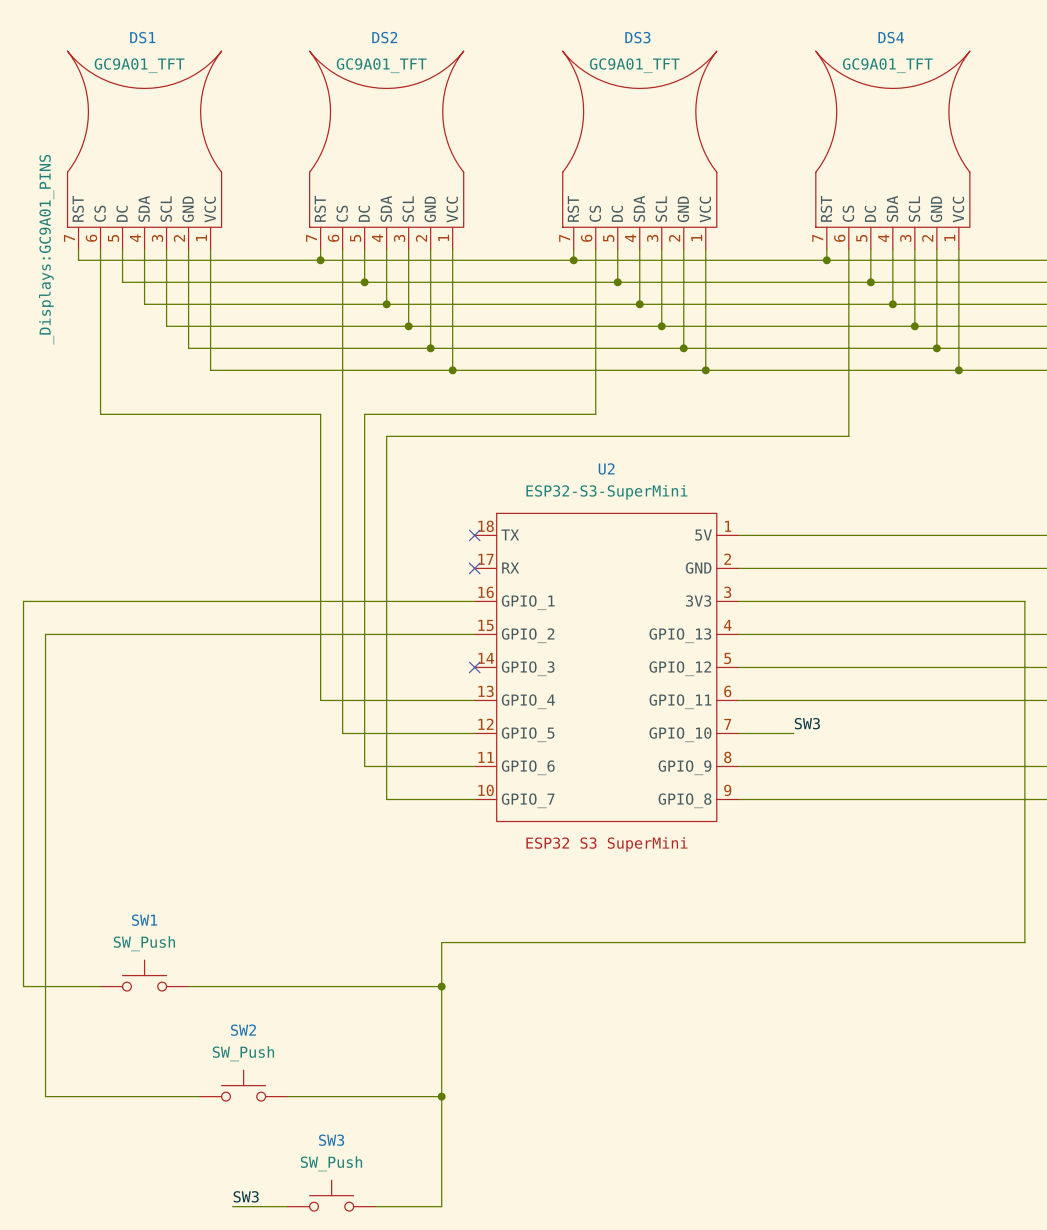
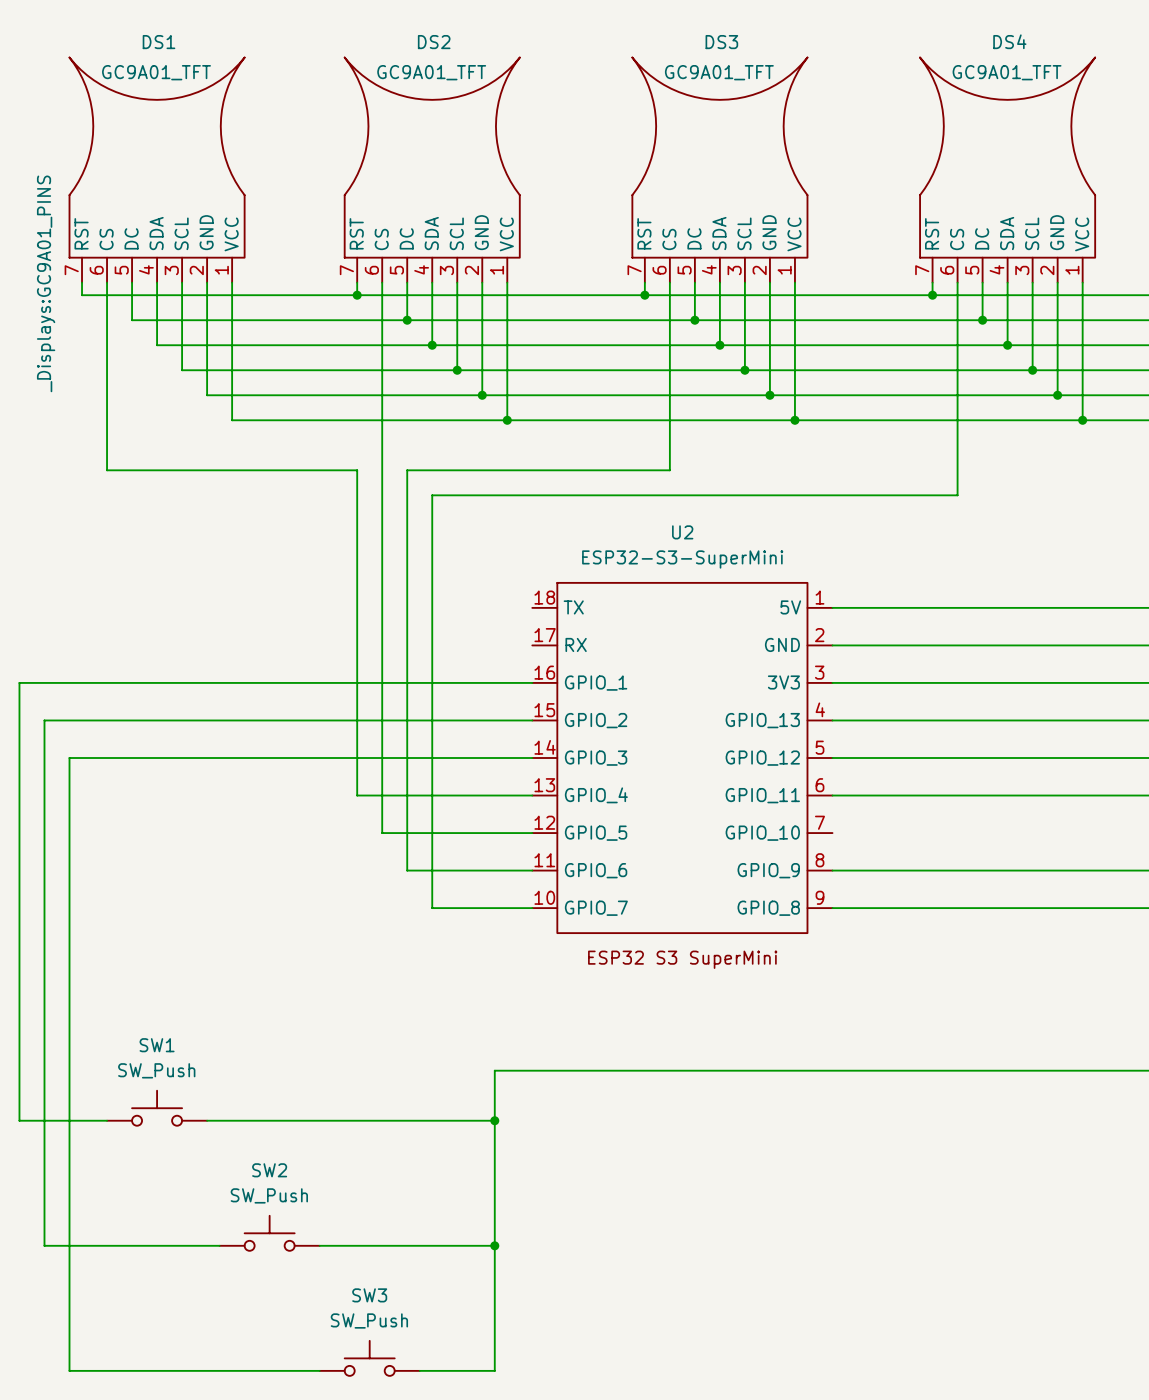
no-connect mark: (474, 535) -> none
no-connect mark: (474, 568) -> none
wire: none -> (532, 758) (69, 758) (69, 1370) (257, 1370)
no-connect mark: (474, 667) -> none
label: SW3 (807, 723) -> none
wire: (738, 733) (793, 733) -> none
label: SW3 (246, 1196) -> none

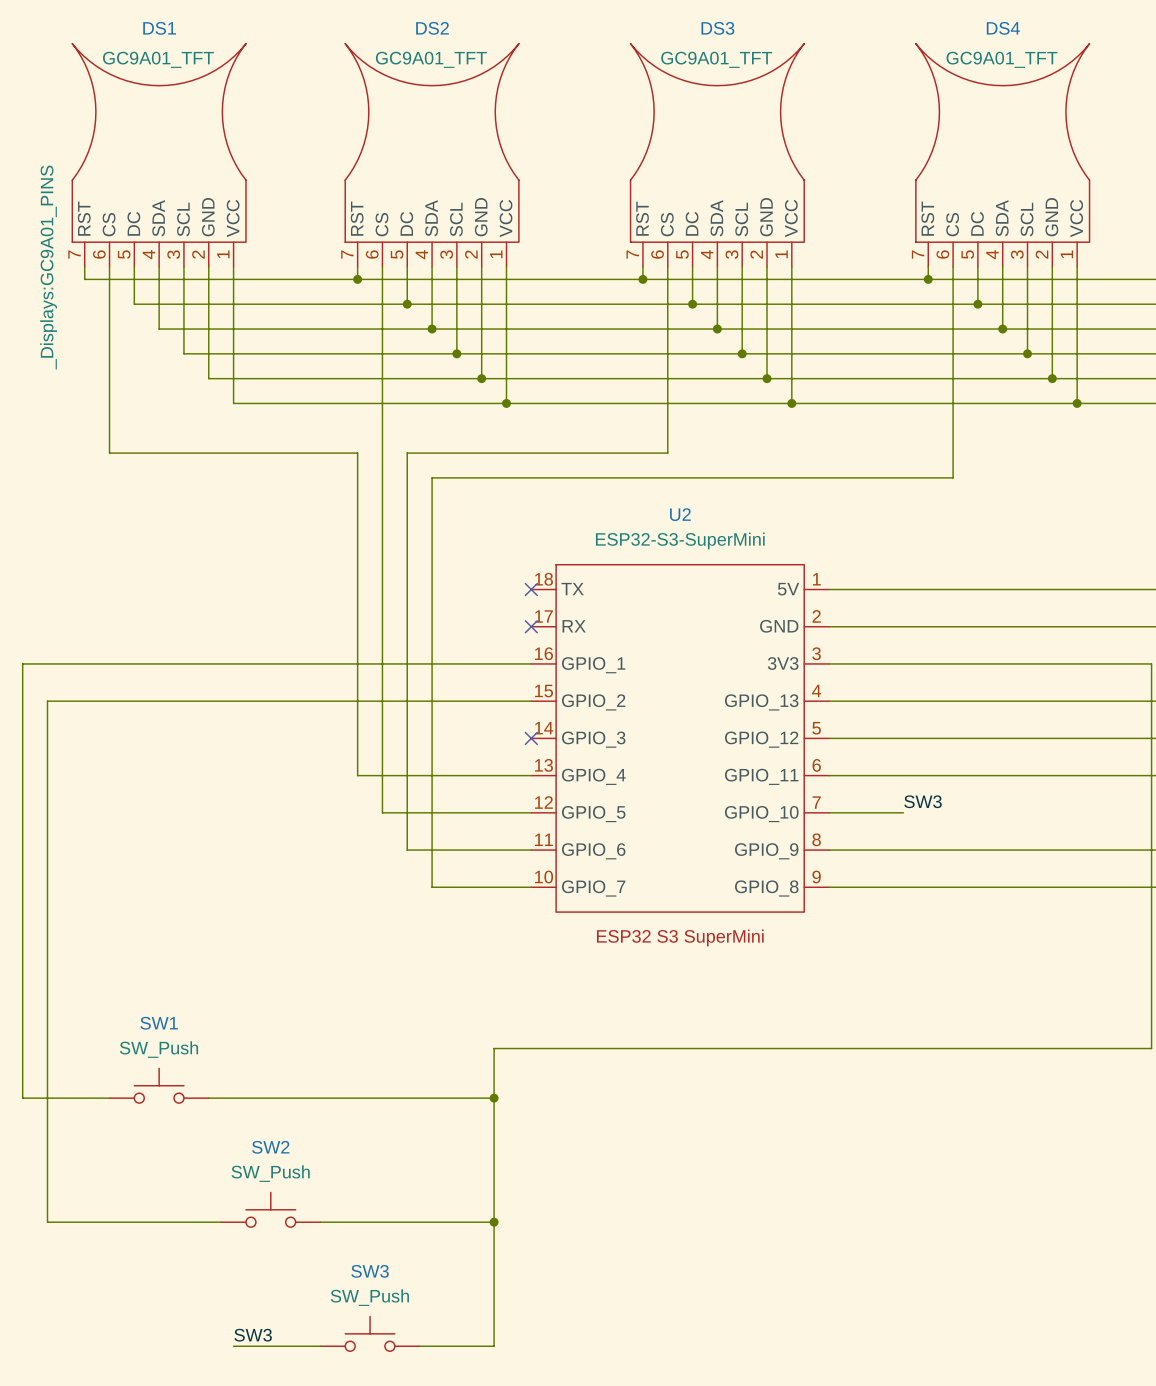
no-connect mark: none -> (531, 589)
no-connect mark: none -> (531, 626)
wire: (532, 758) (69, 758) (69, 1370) (232, 1370) -> none
no-connect mark: none -> (531, 738)
label: none -> SW3 (923, 801)
wire: none -> (829, 812) (903, 812)
label: none -> SW3 (253, 1335)

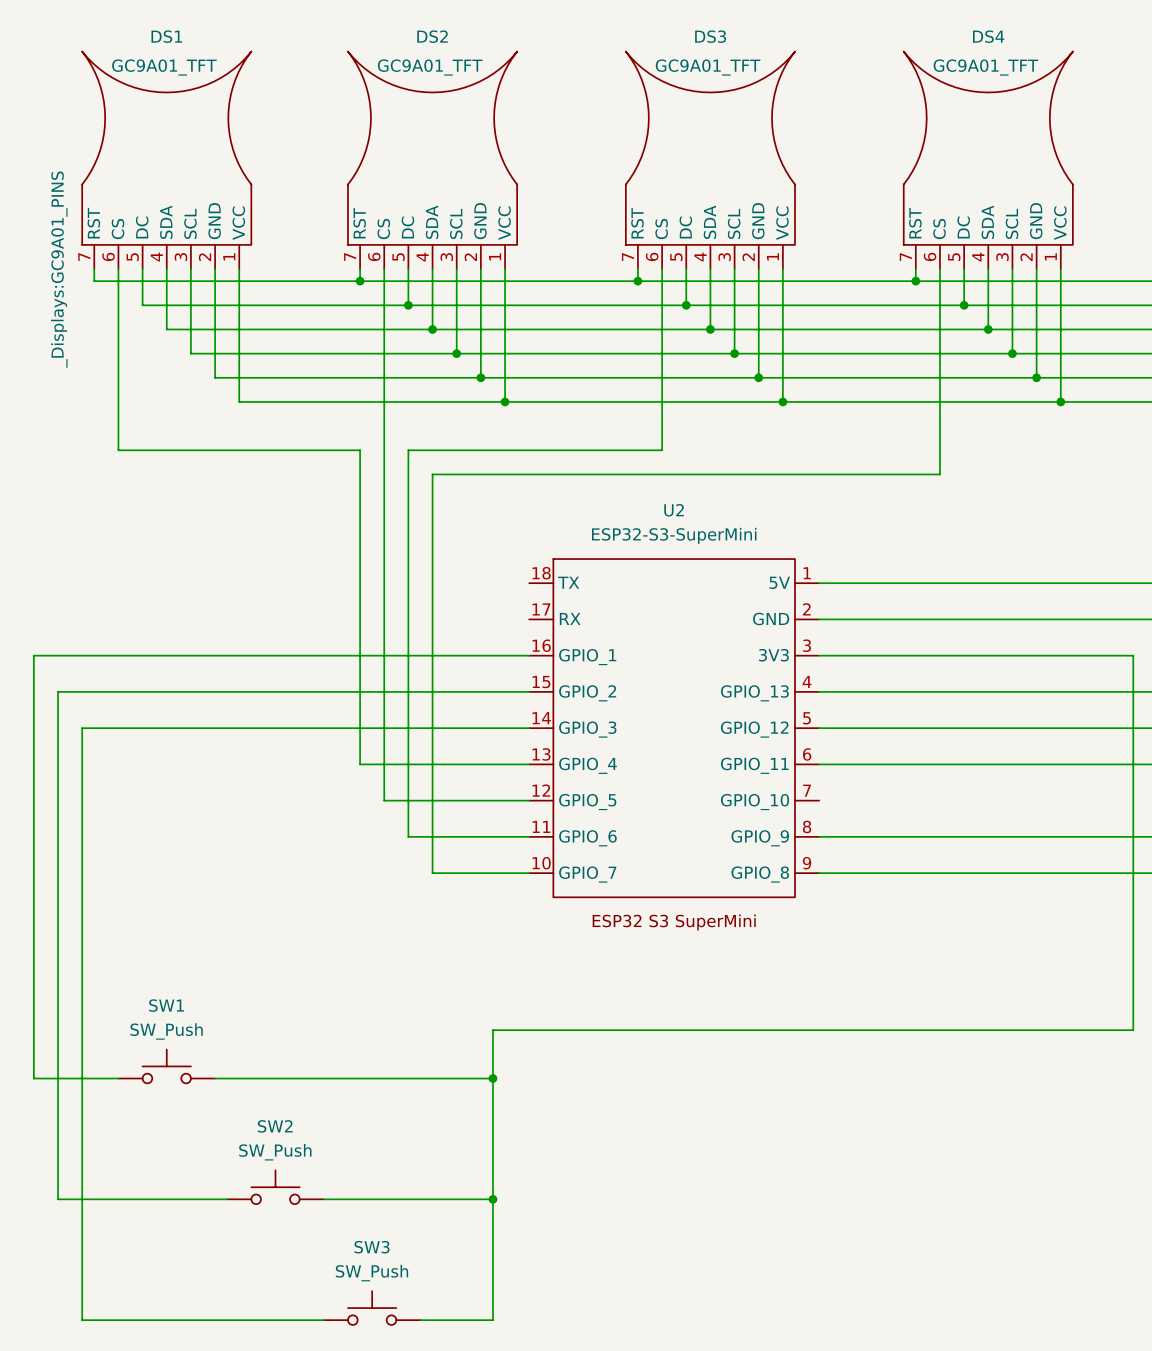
no-connect mark: (531, 589) -> none
no-connect mark: (531, 626) -> none
wire: none -> (529, 728) (82, 728) (82, 1320) (239, 1320)
no-connect mark: (531, 738) -> none
label: SW3 (923, 801) -> none
wire: (829, 812) (903, 812) -> none
label: SW3 (253, 1335) -> none

